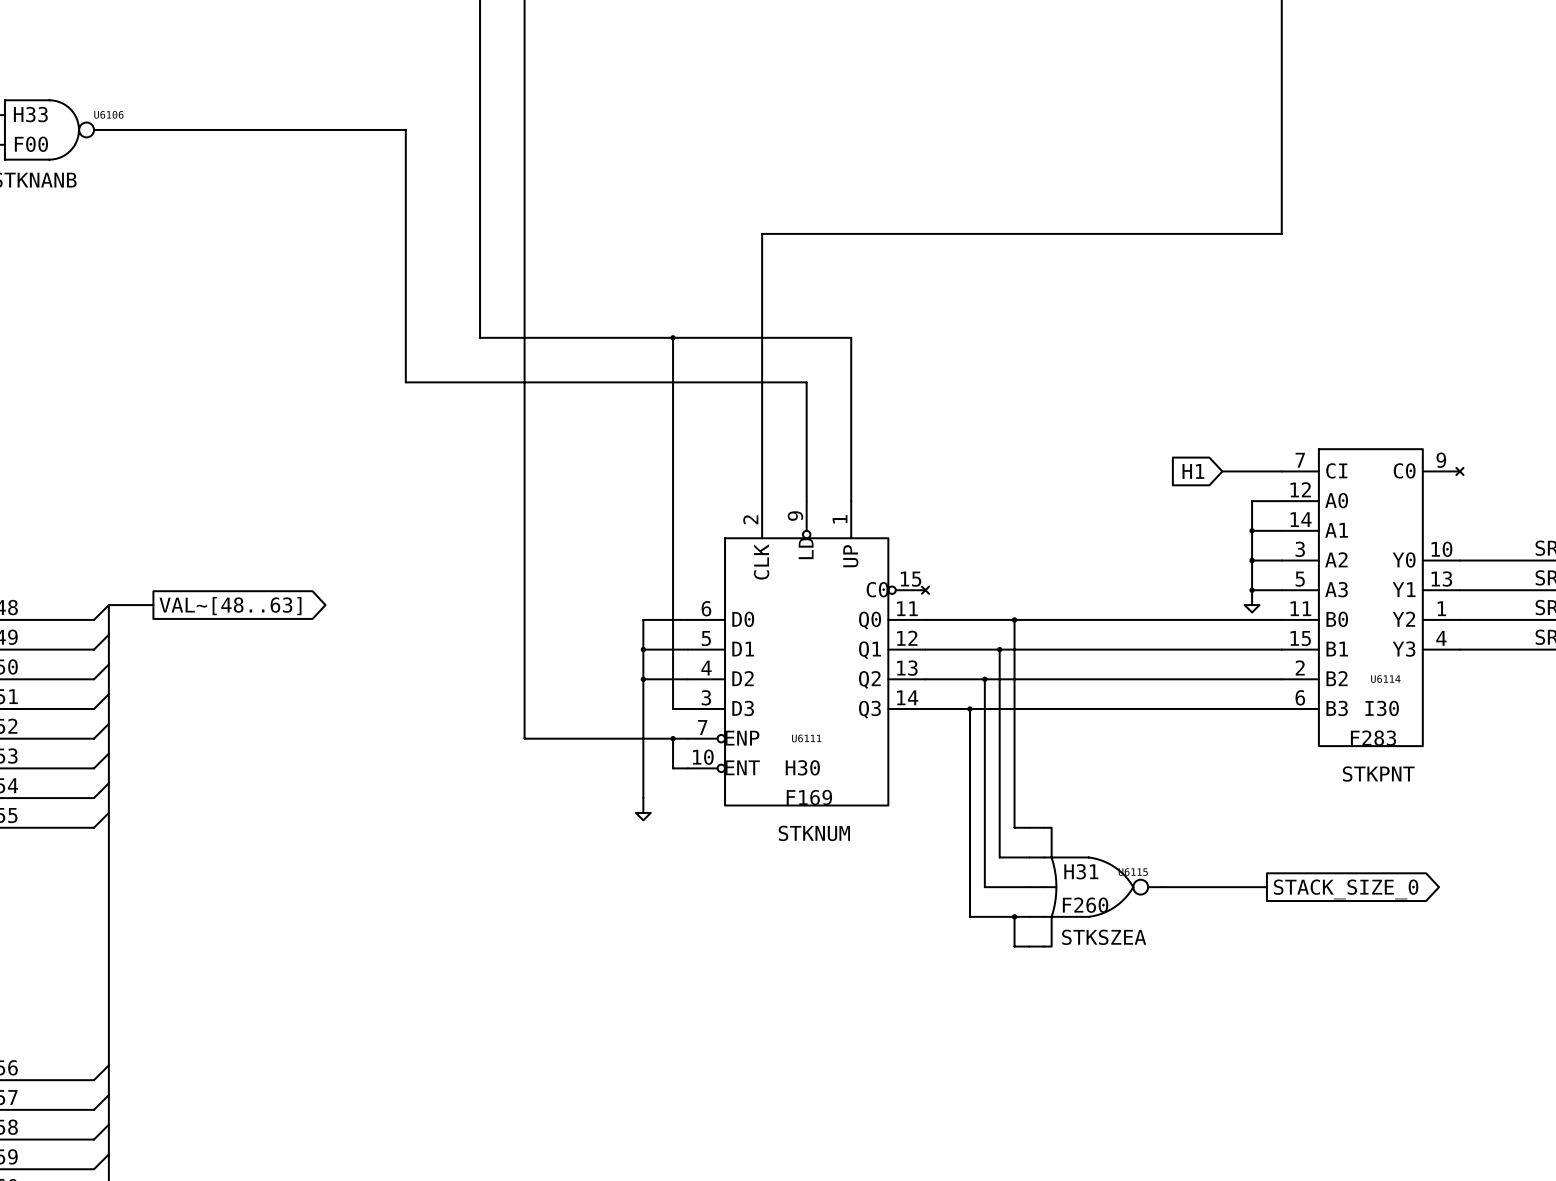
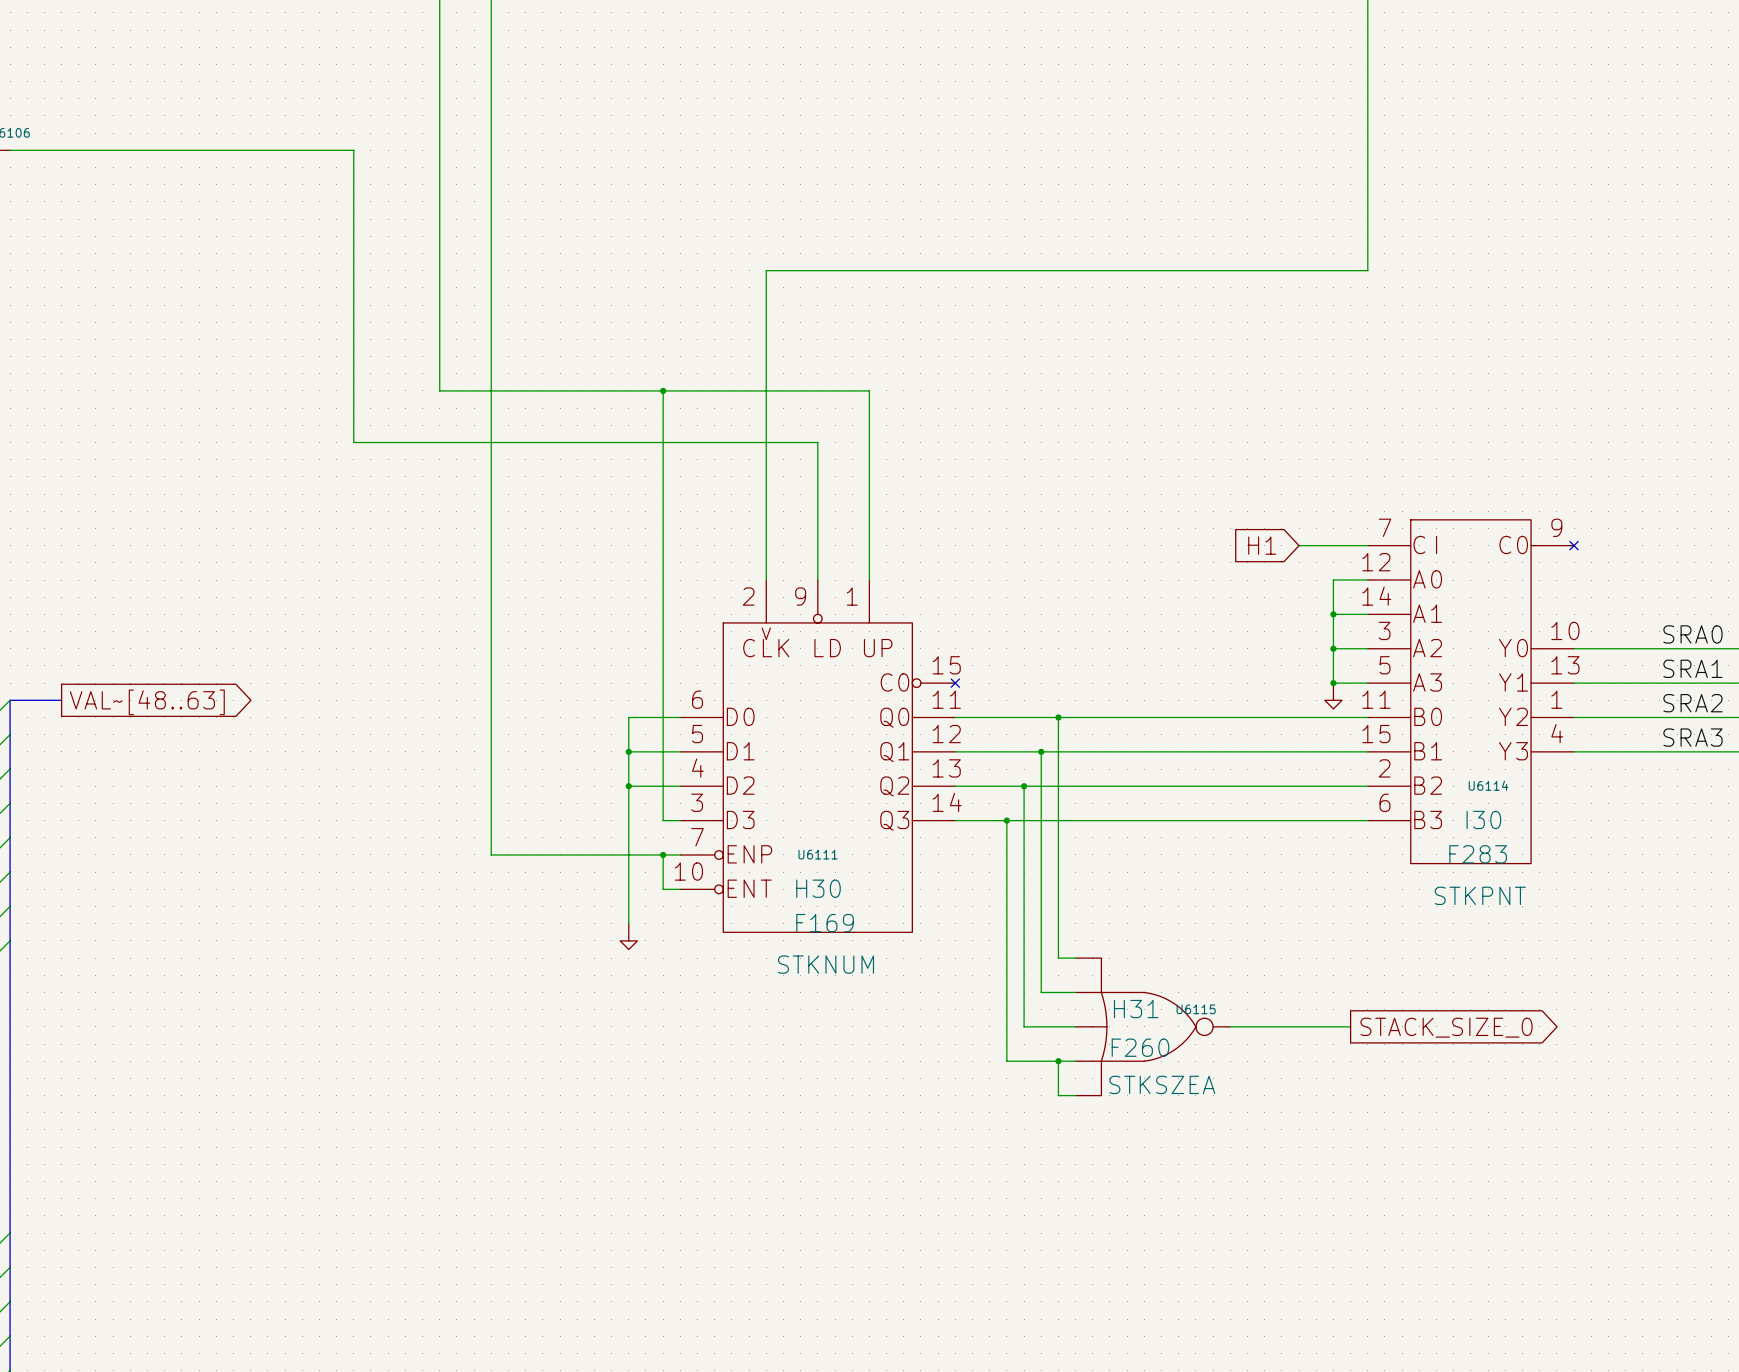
U6114 symbol: [1281, 449, 1460, 747] -> [1367, 519, 1575, 864]
U6111 symbol: [687, 501, 926, 806] -> [680, 580, 956, 933]

